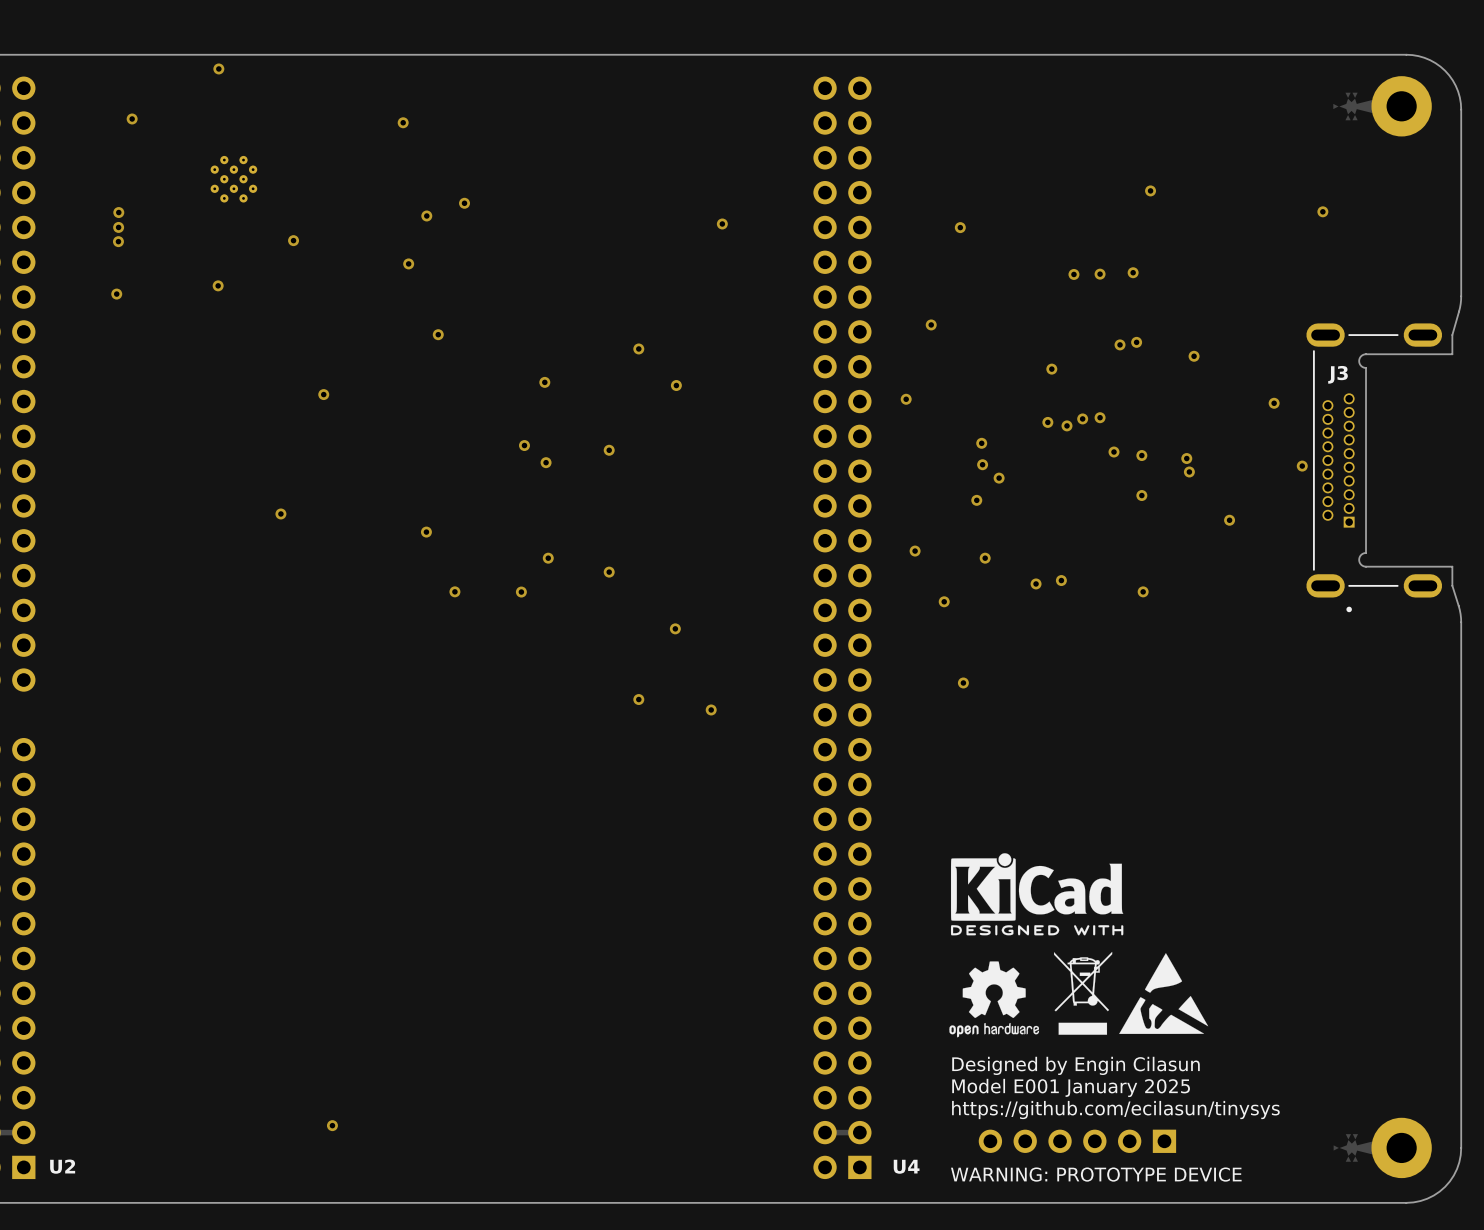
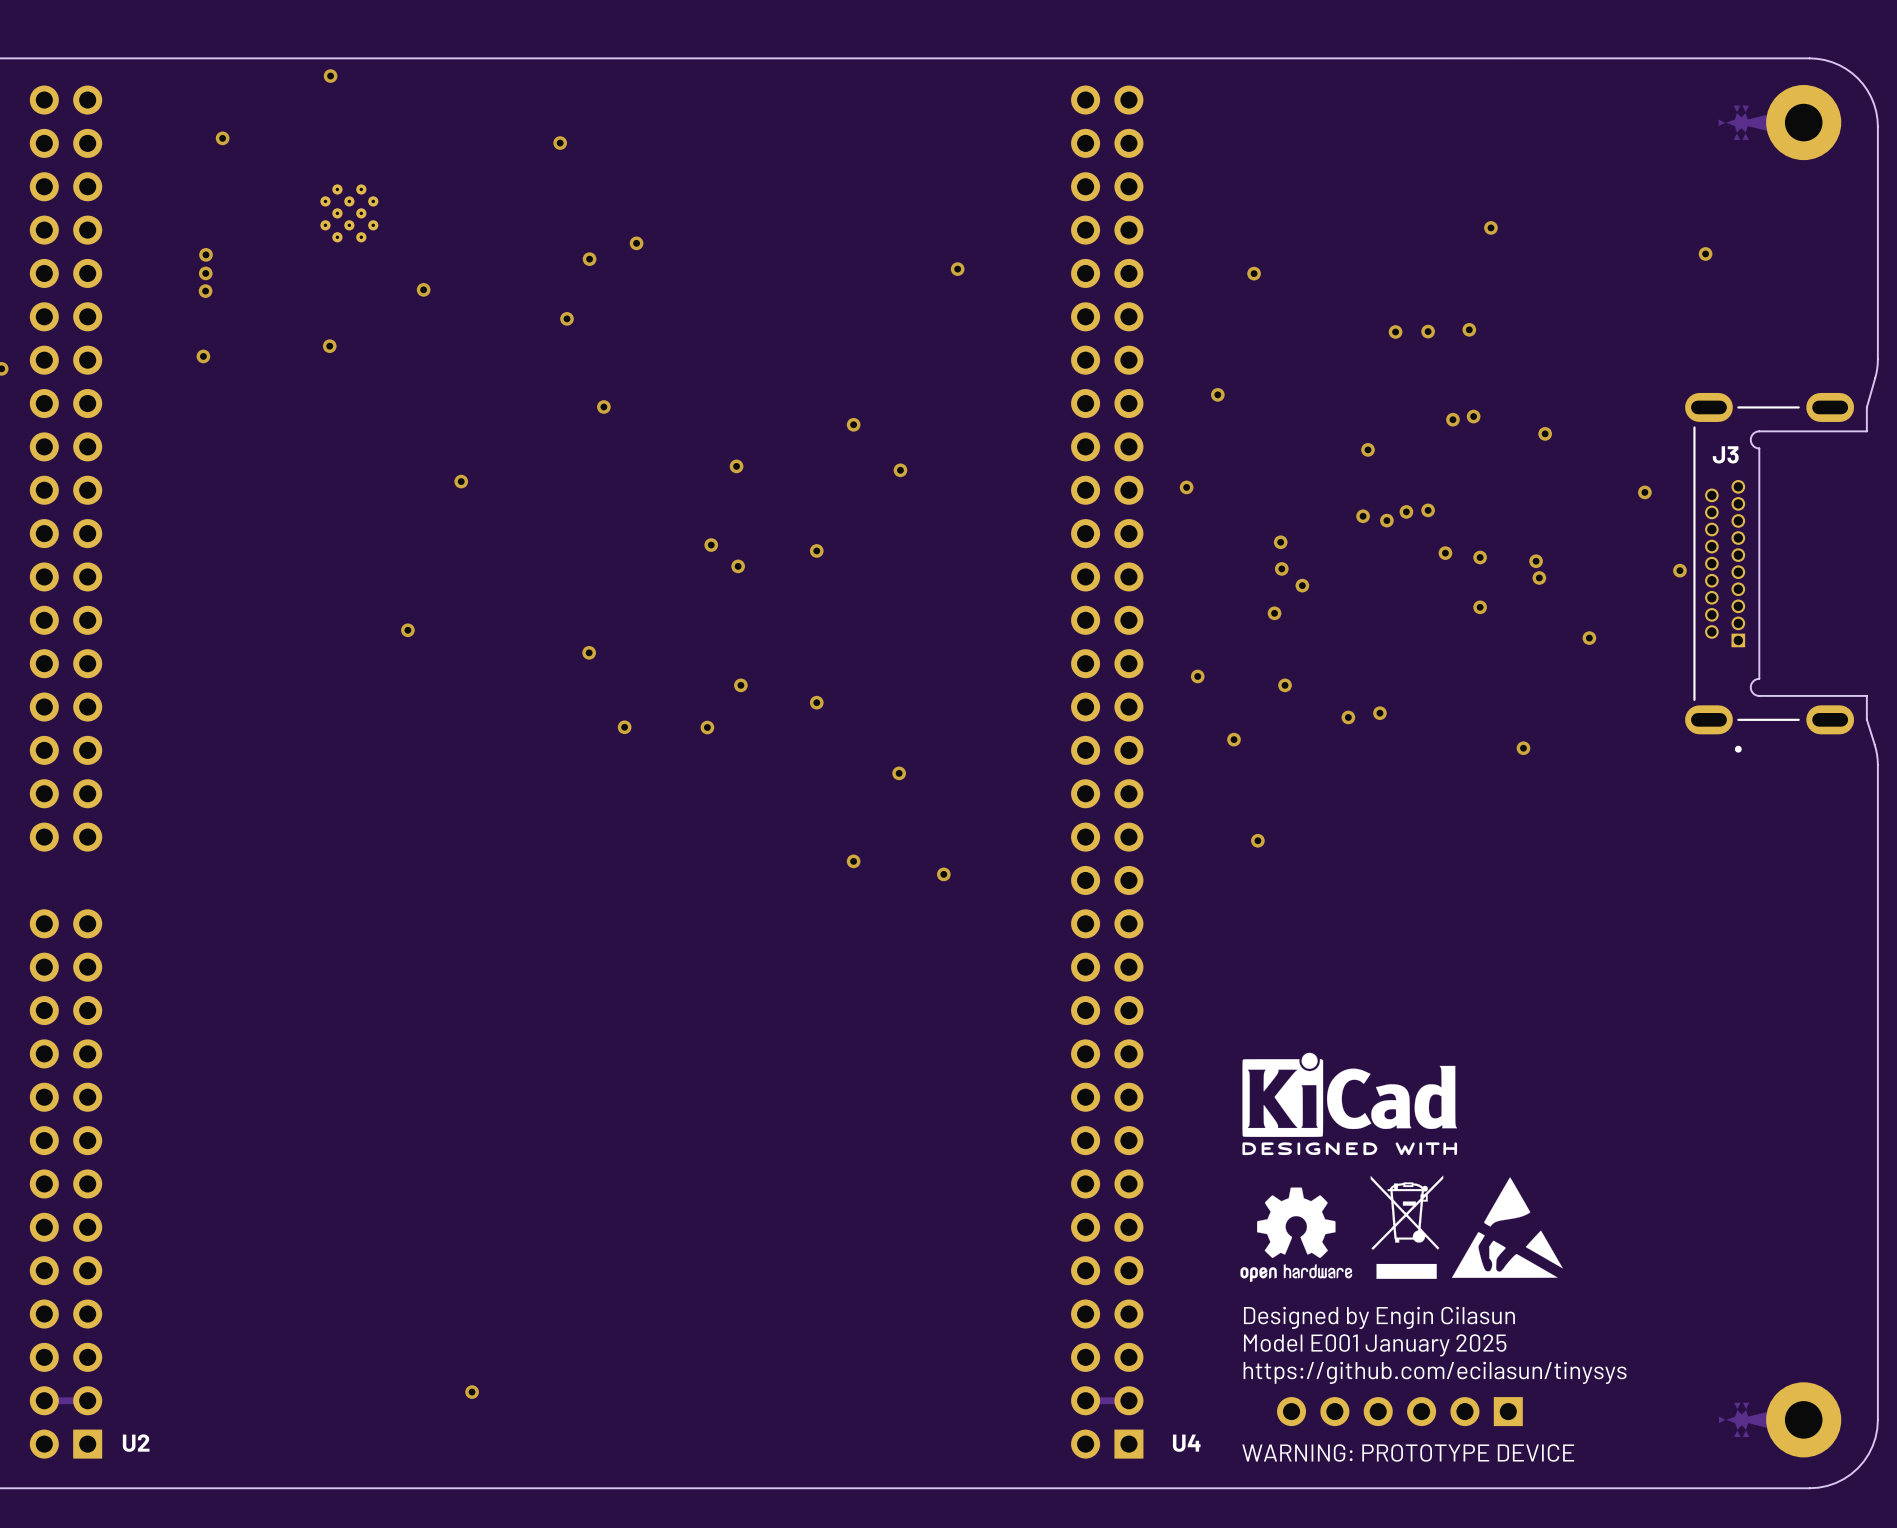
via position: (1143, 591) -> (1523, 748)

